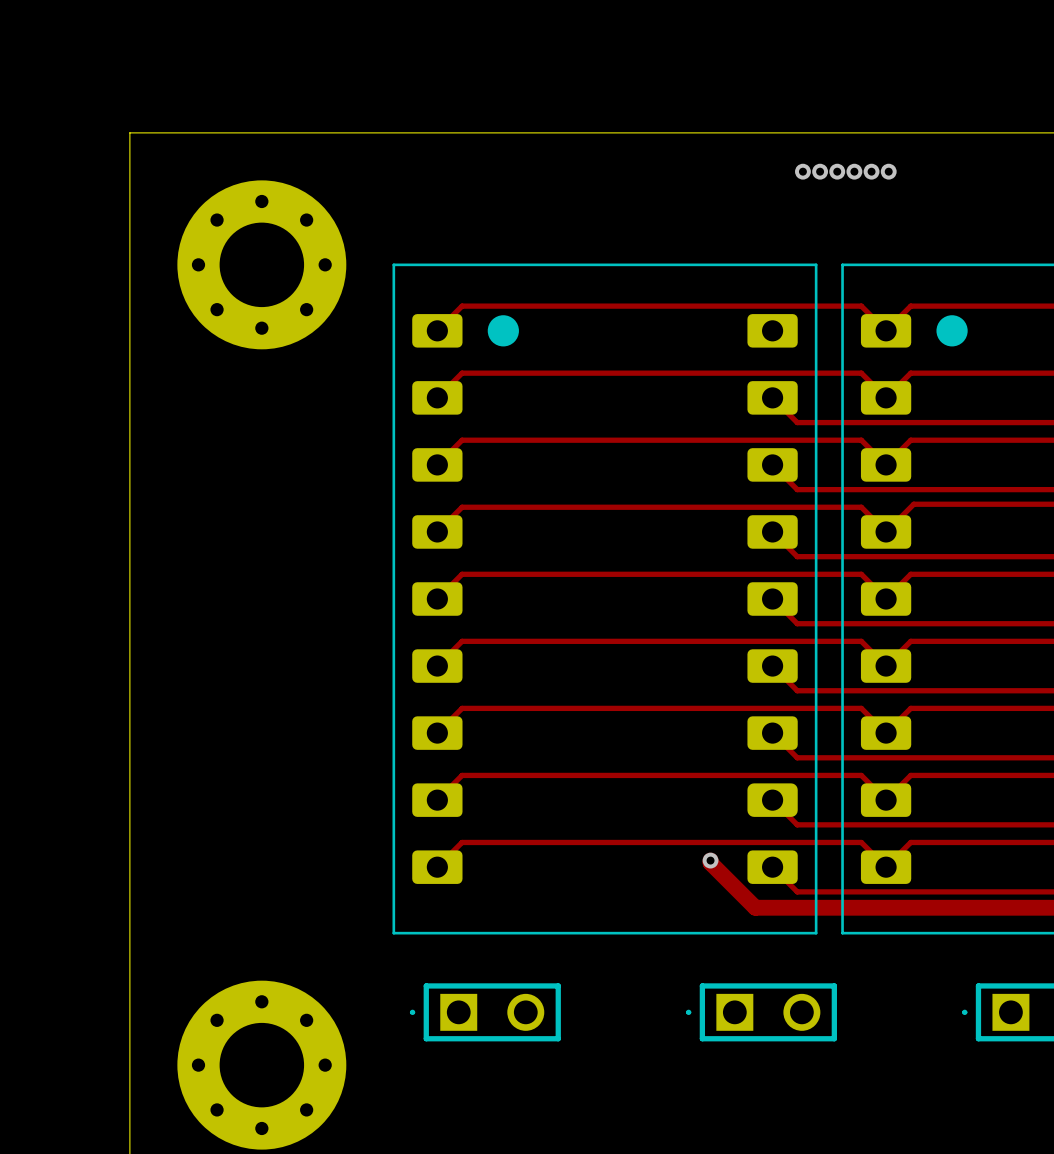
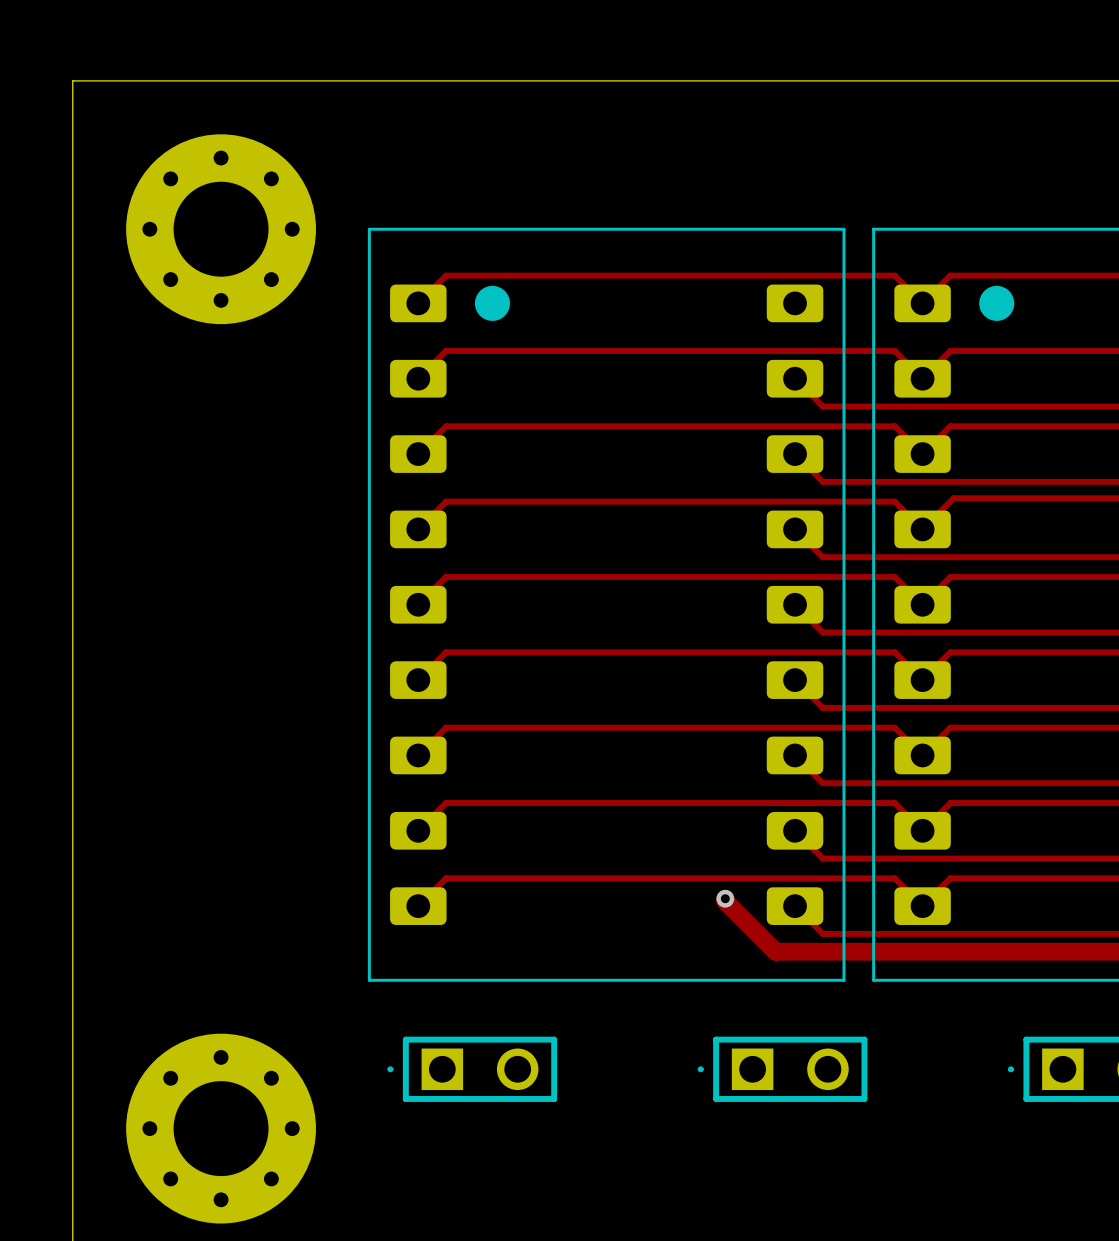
via: (802, 171) -> none
via: (820, 171) -> none
via: (837, 171) -> none
via: (854, 171) -> none
via: (871, 171) -> none
via: (888, 171) -> none

